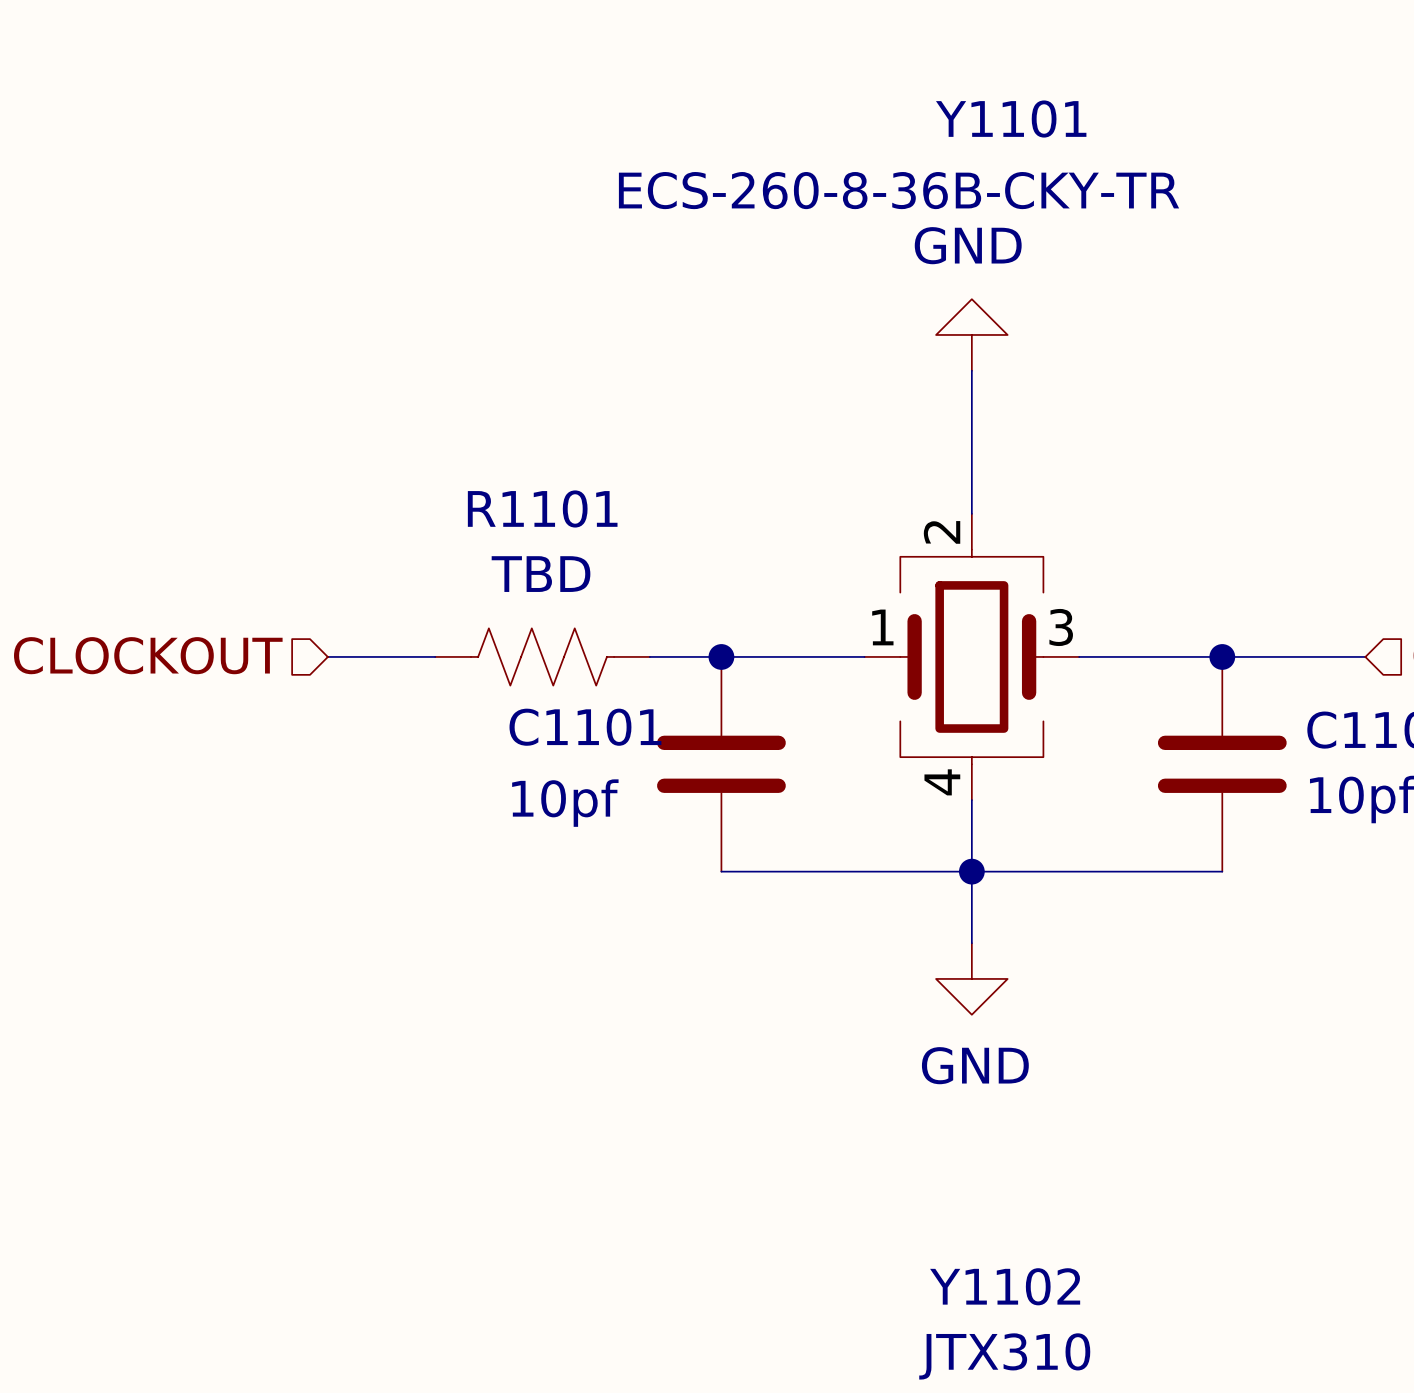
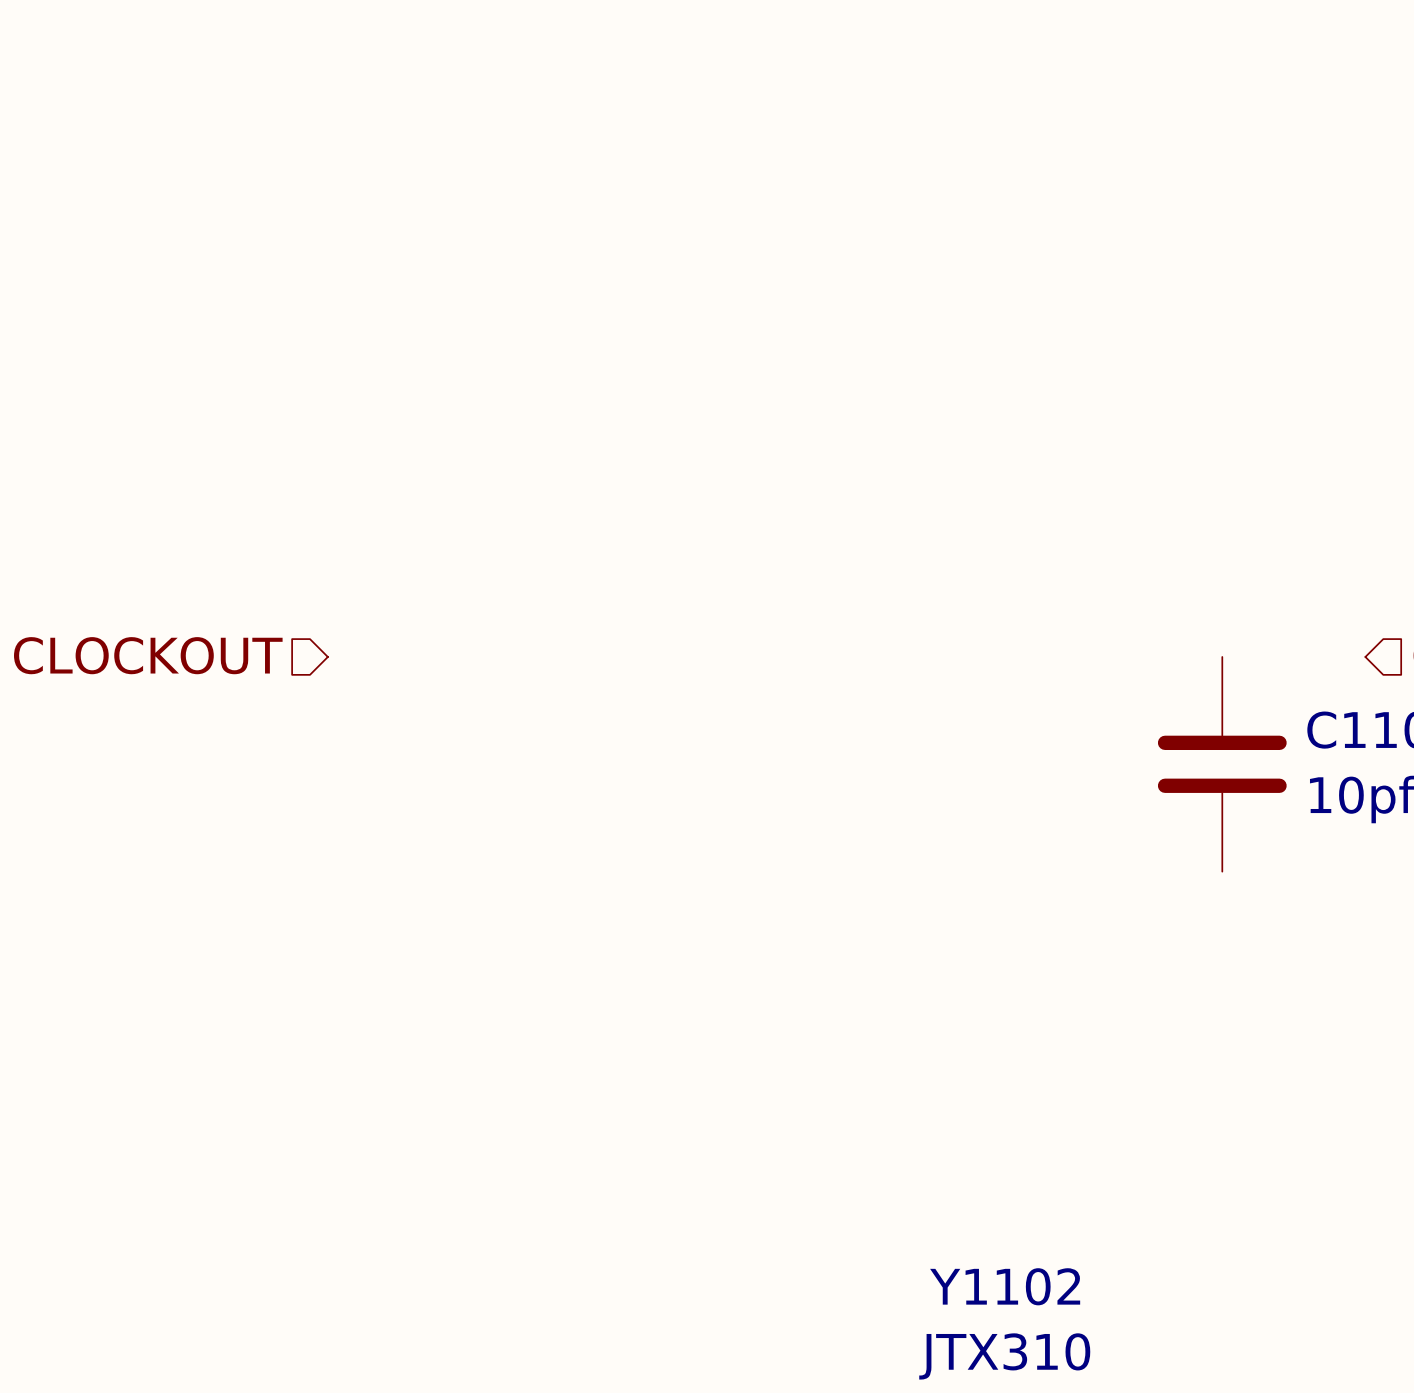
power symbol: GND (971, 334) -> none
wire: (971, 370) (971, 513) -> none
wire: (327, 656) (435, 656) -> none
R1101: TBD (542, 656) -> none
wire: (649, 656) (864, 656) -> none
junction: (721, 656) -> none
Y1101: ECS-260-8-36B-CKY-TR (971, 656) -> none
wire: (1079, 656) (1365, 656) -> none
junction: (1222, 656) -> none
C1101: 10pf (721, 764) -> none
wire: (971, 800) (971, 943) -> none
wire: (721, 871) (1222, 871) -> none
junction: (971, 871) -> none
power symbol: GND (971, 978) -> none

